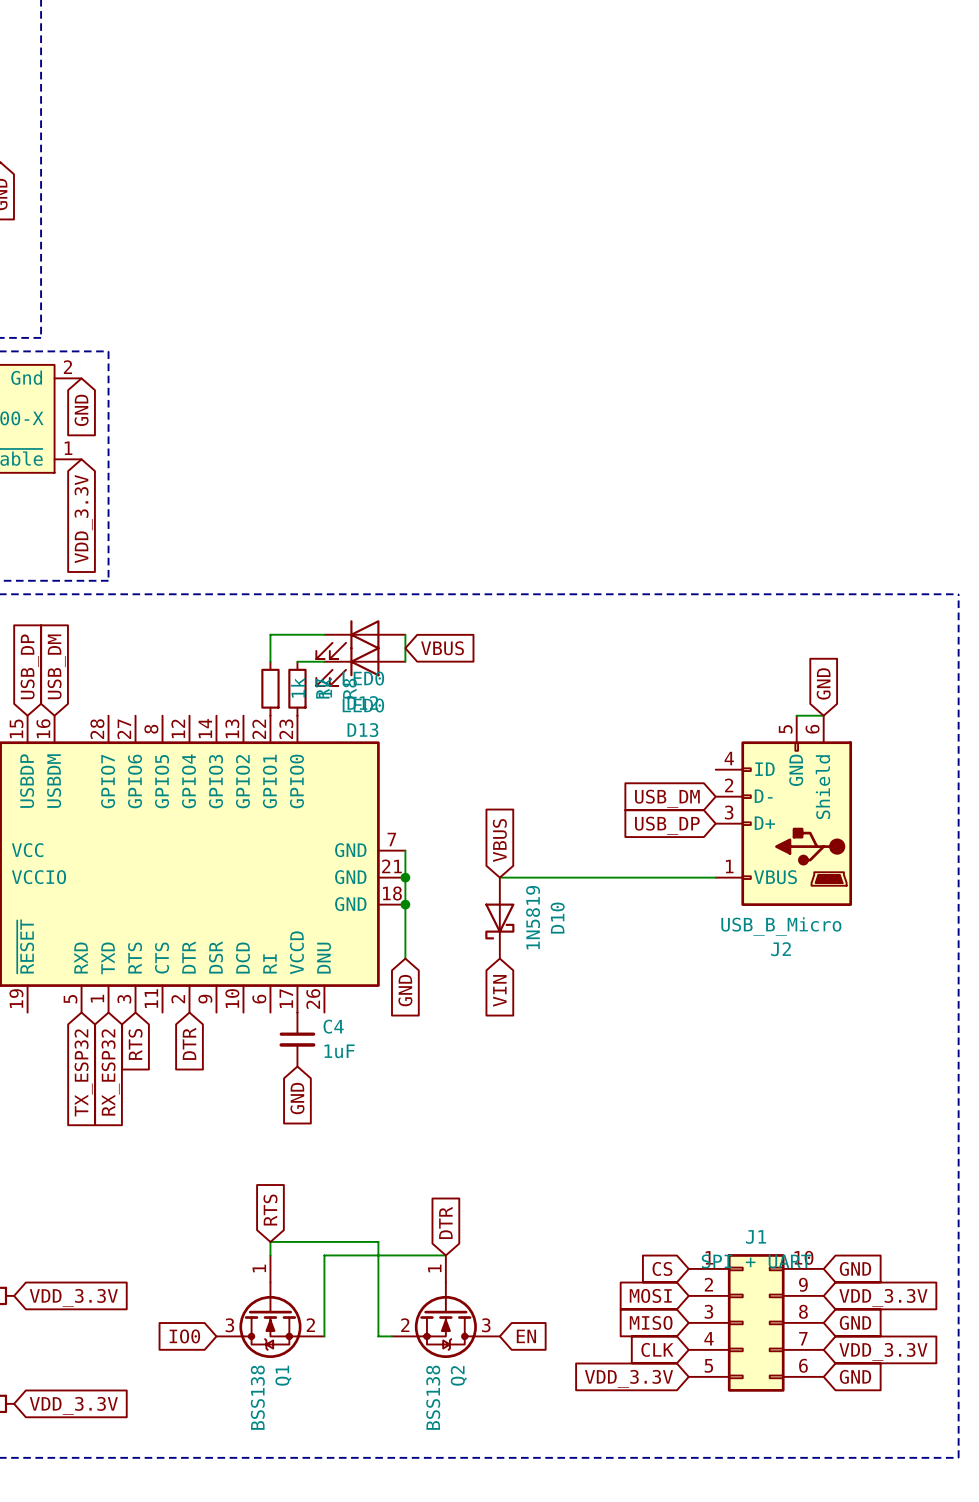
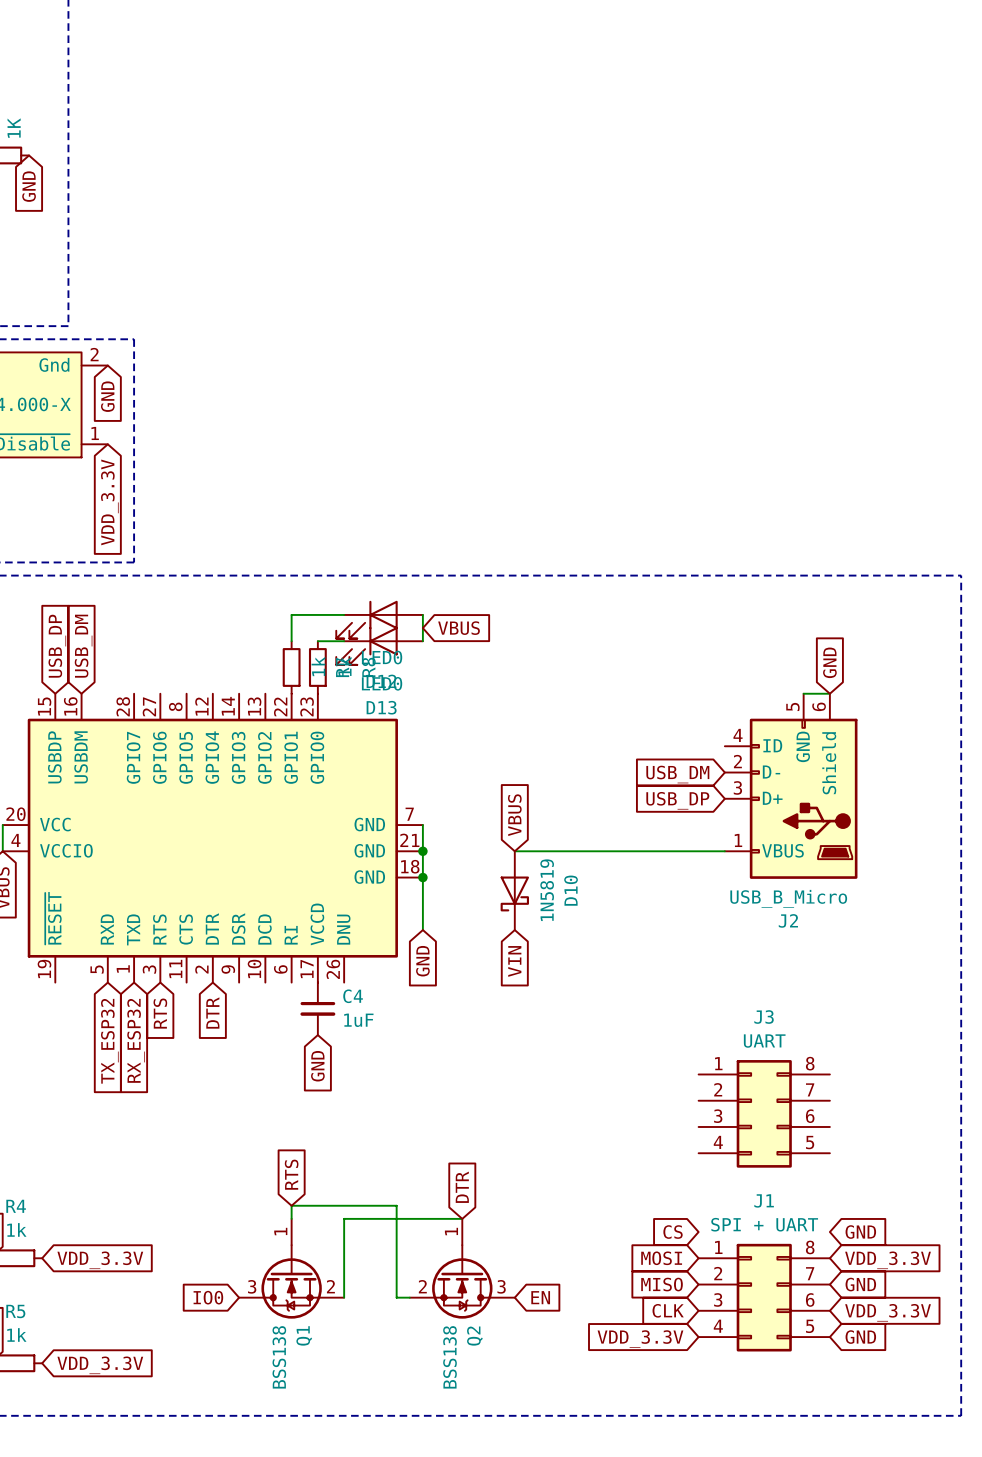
J3: none -> UART (764, 1113)
J1 symbol: [688, 1254, 824, 1392] -> [698, 1243, 830, 1352]

